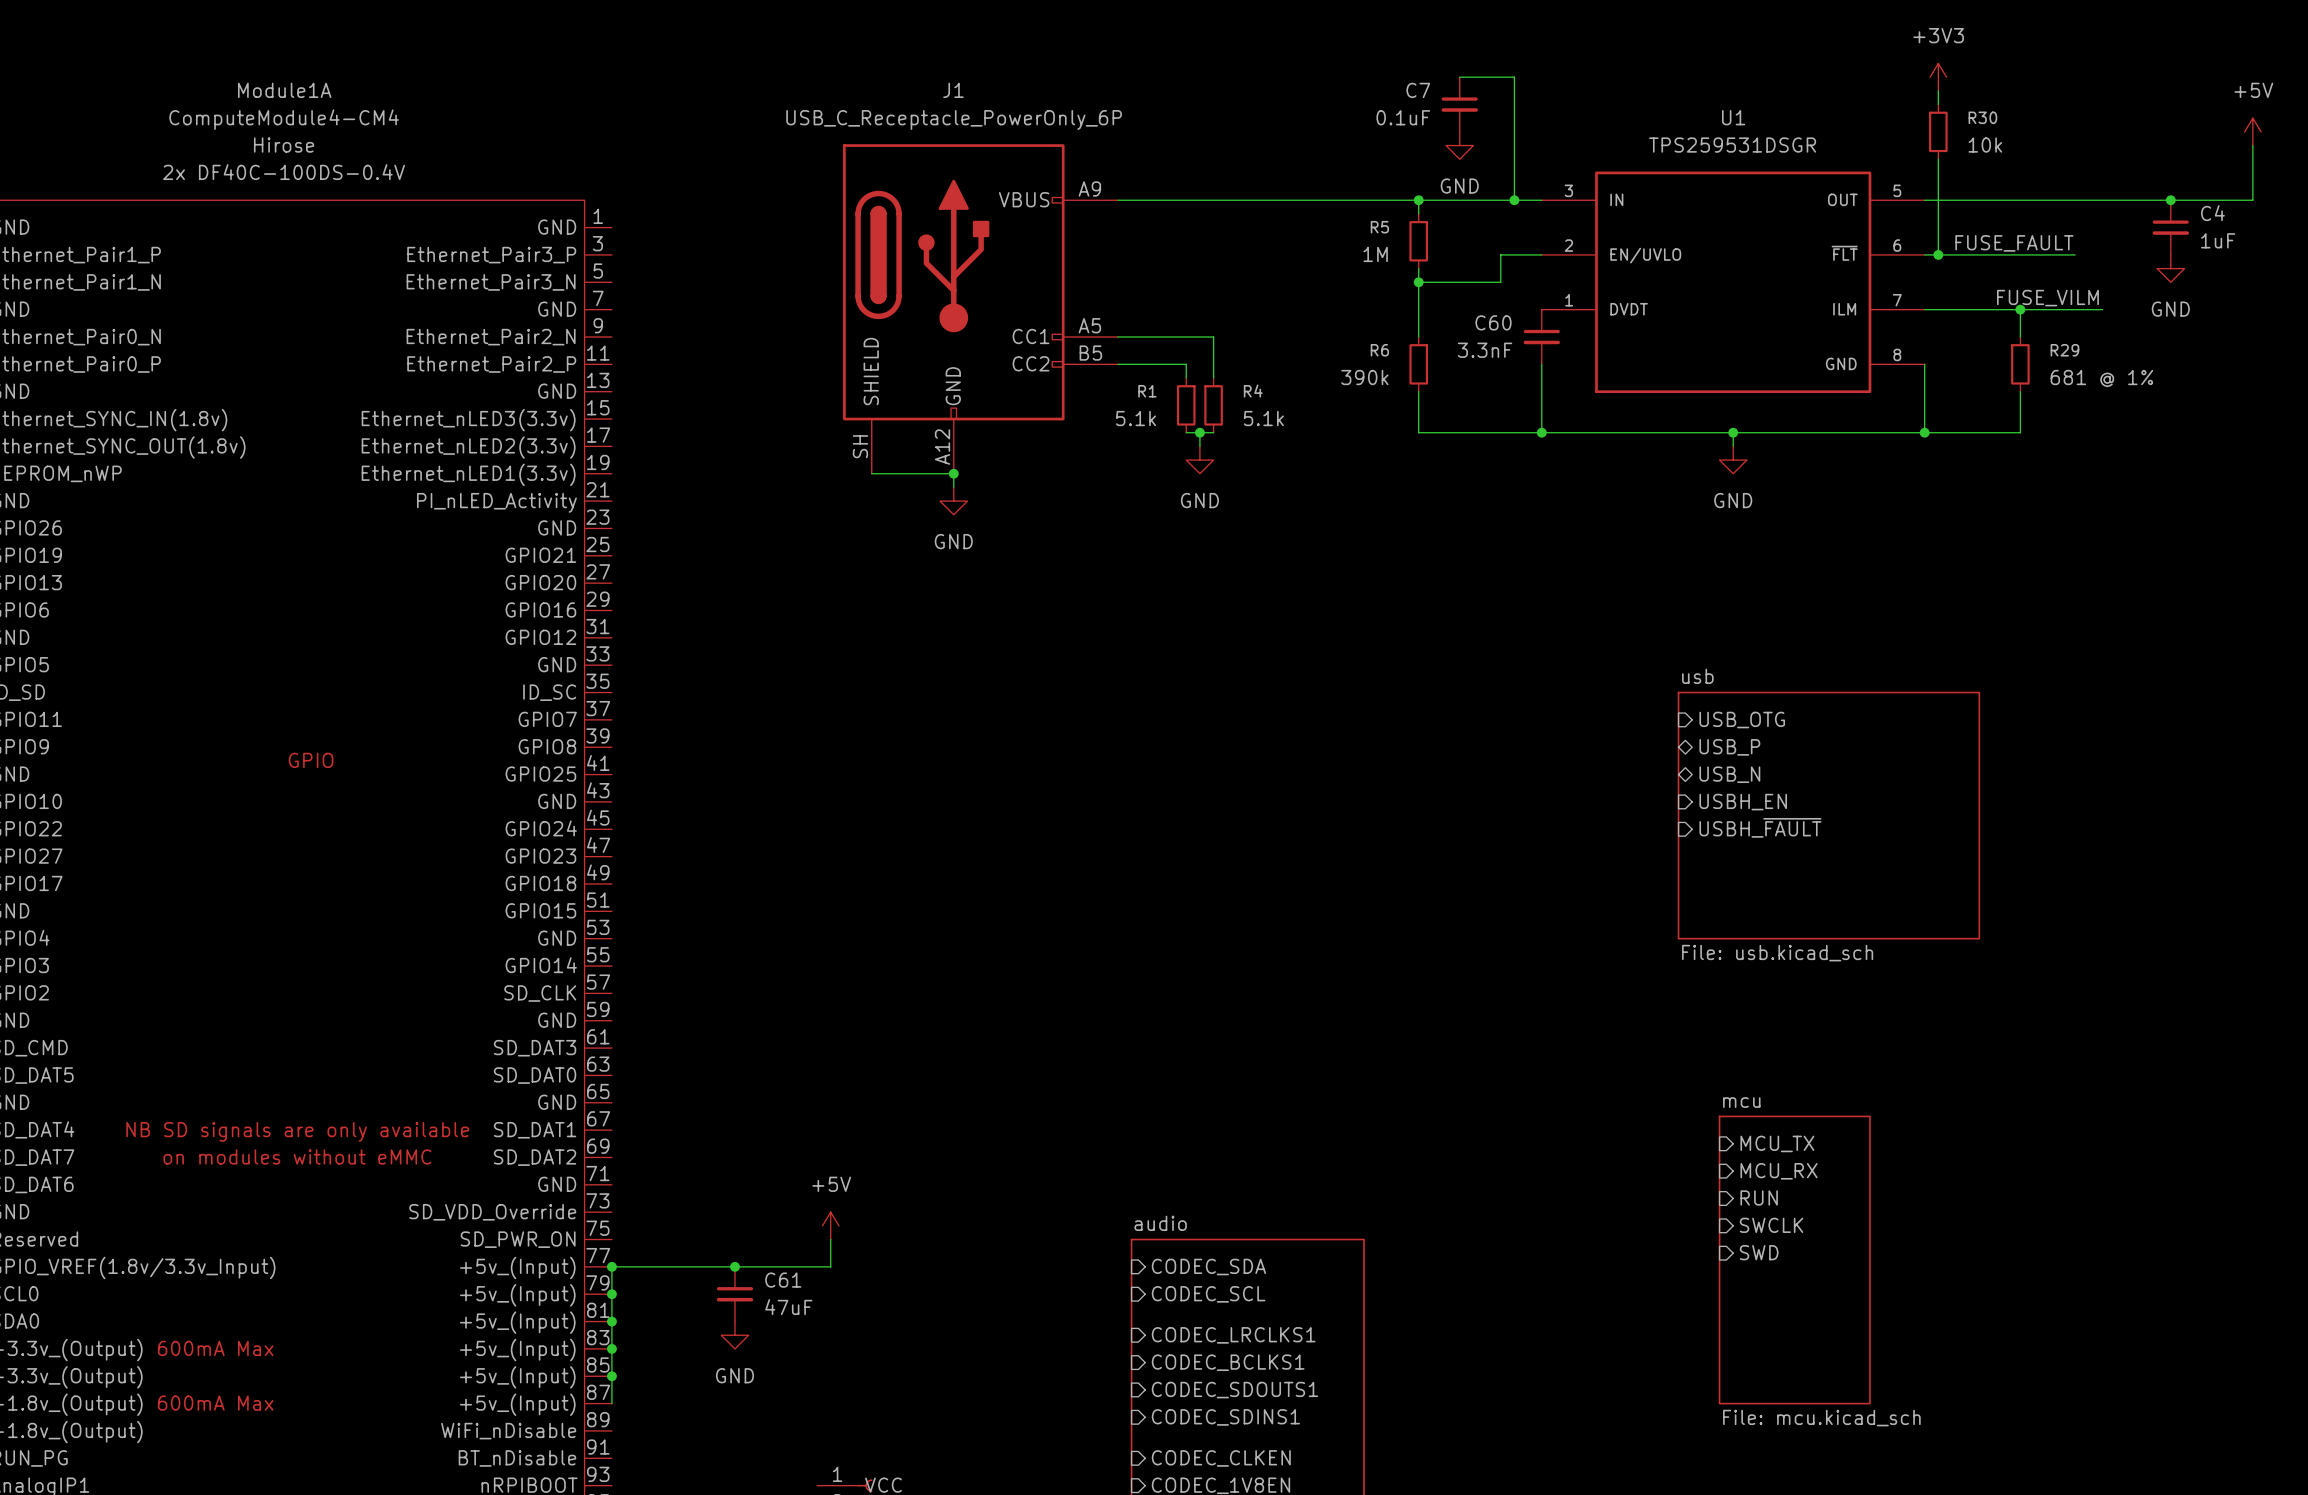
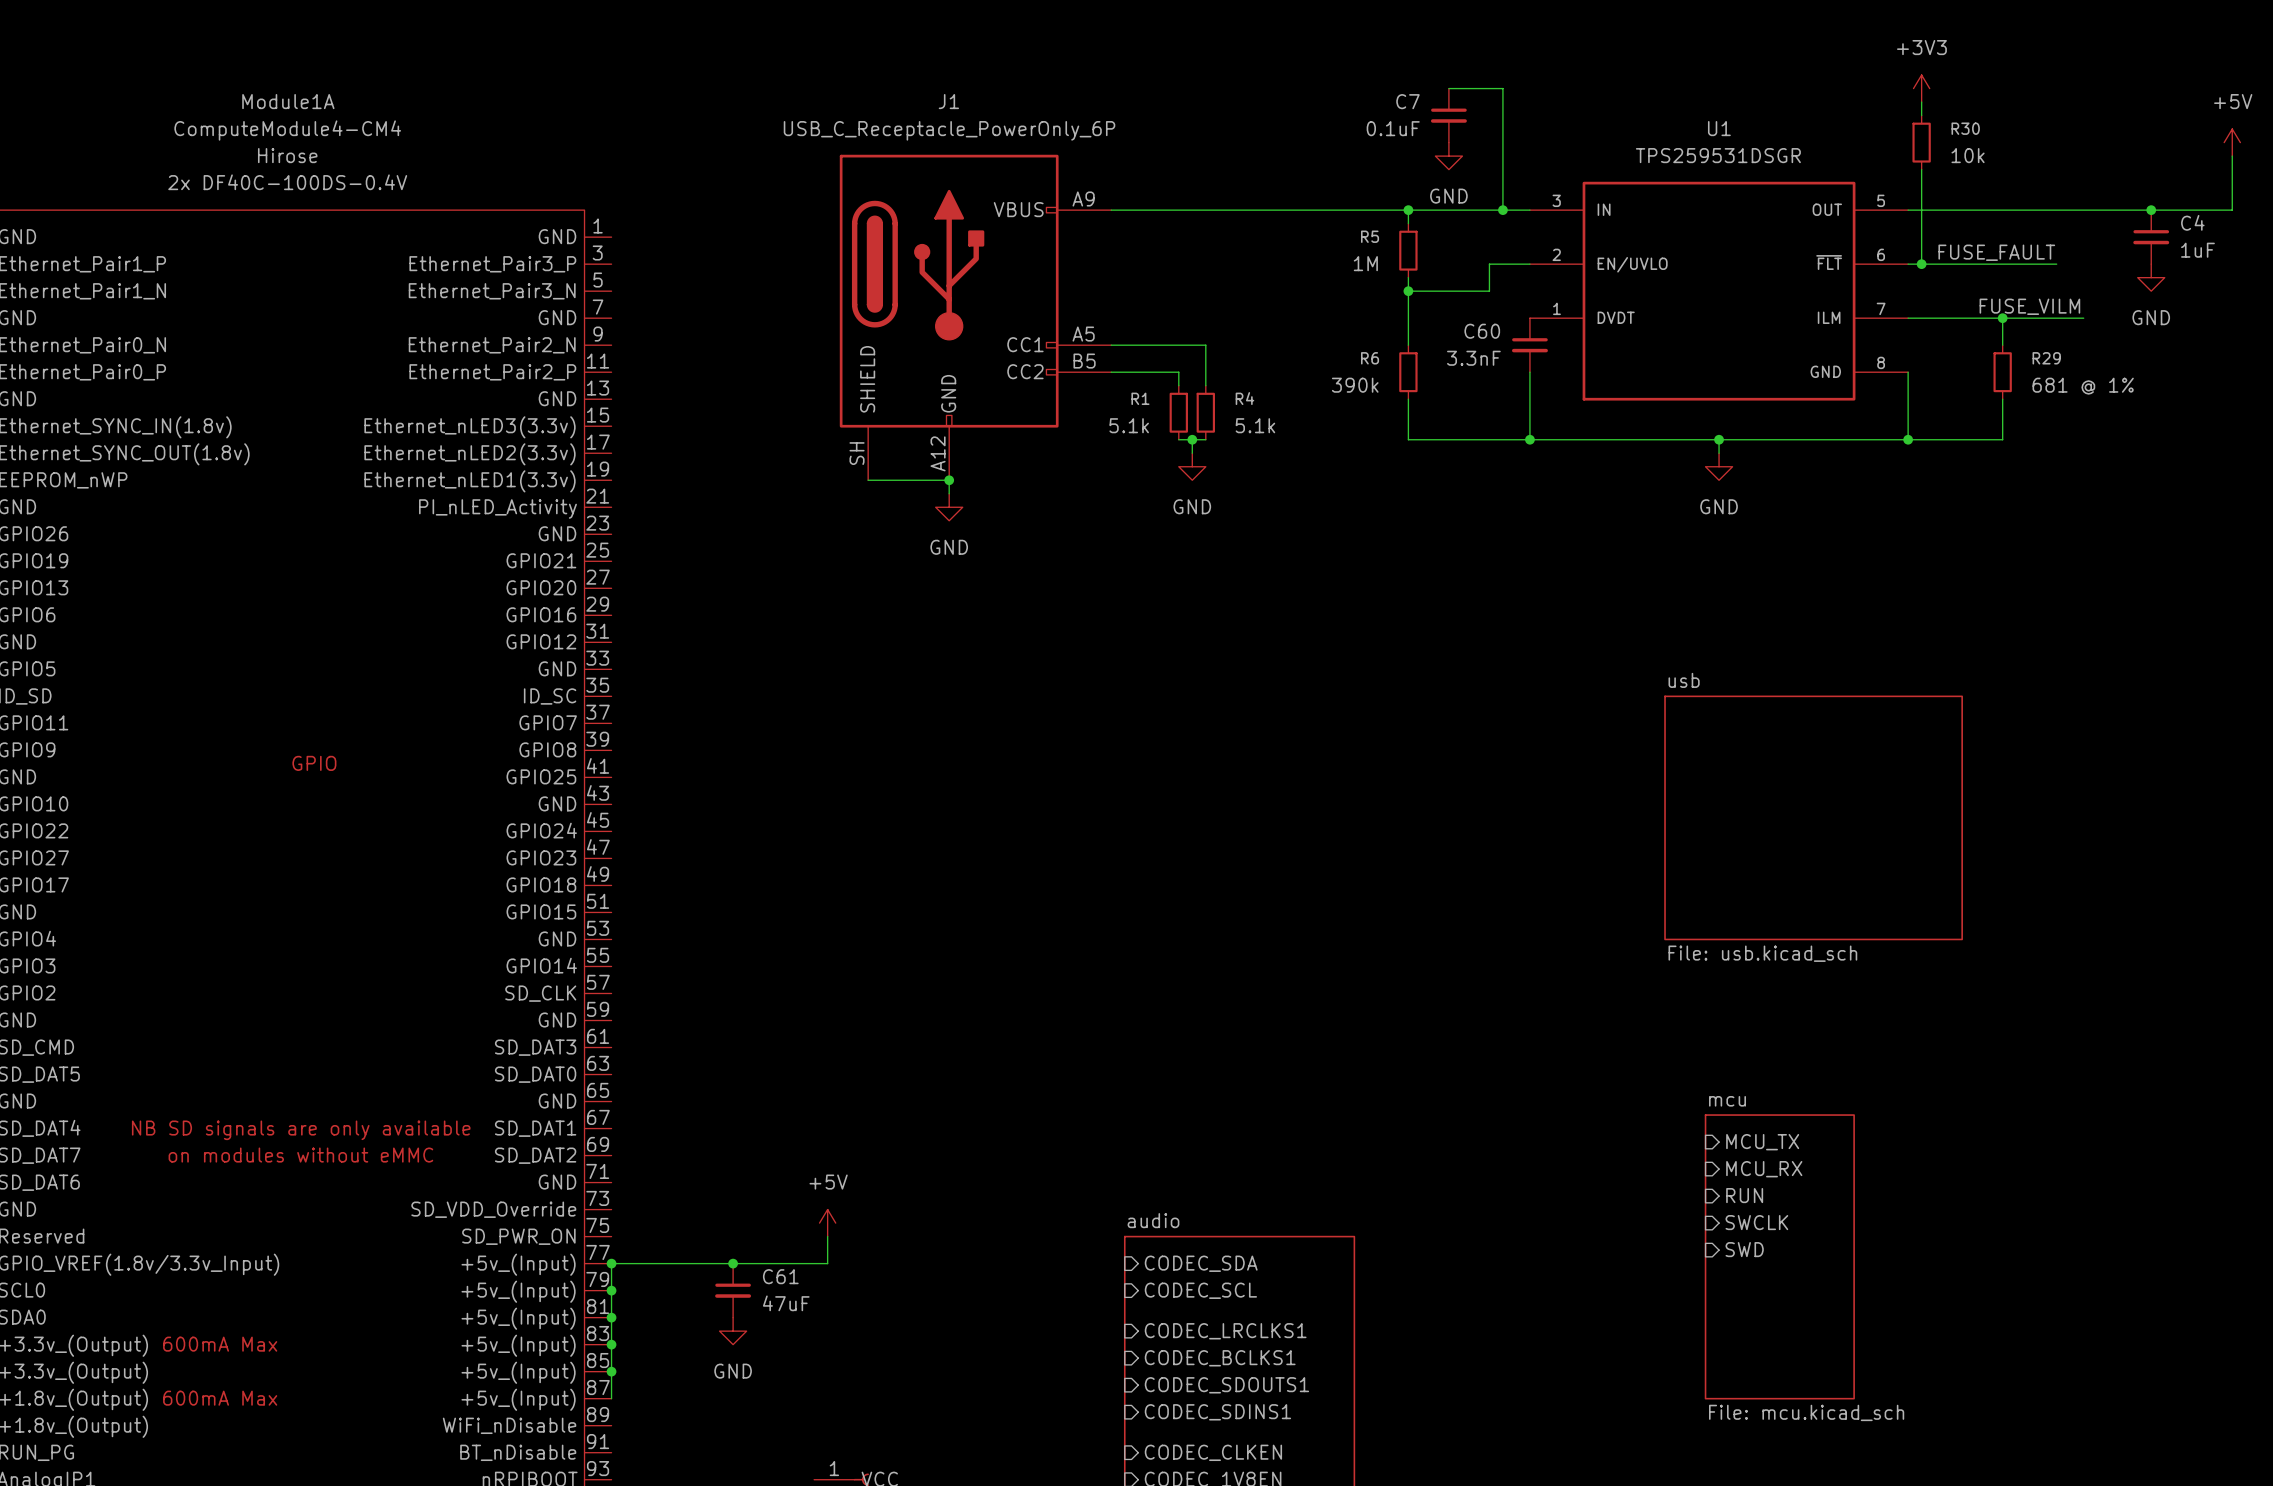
sheet pin: USB_OTG (1742, 720) -> none
sheet pin: USB_P (1729, 747) -> none
sheet pin: USB_N (1729, 774) -> none
sheet pin: USBH_EN (1743, 802) -> none
sheet pin: USBH_~{FAULT} (1760, 827) -> none

